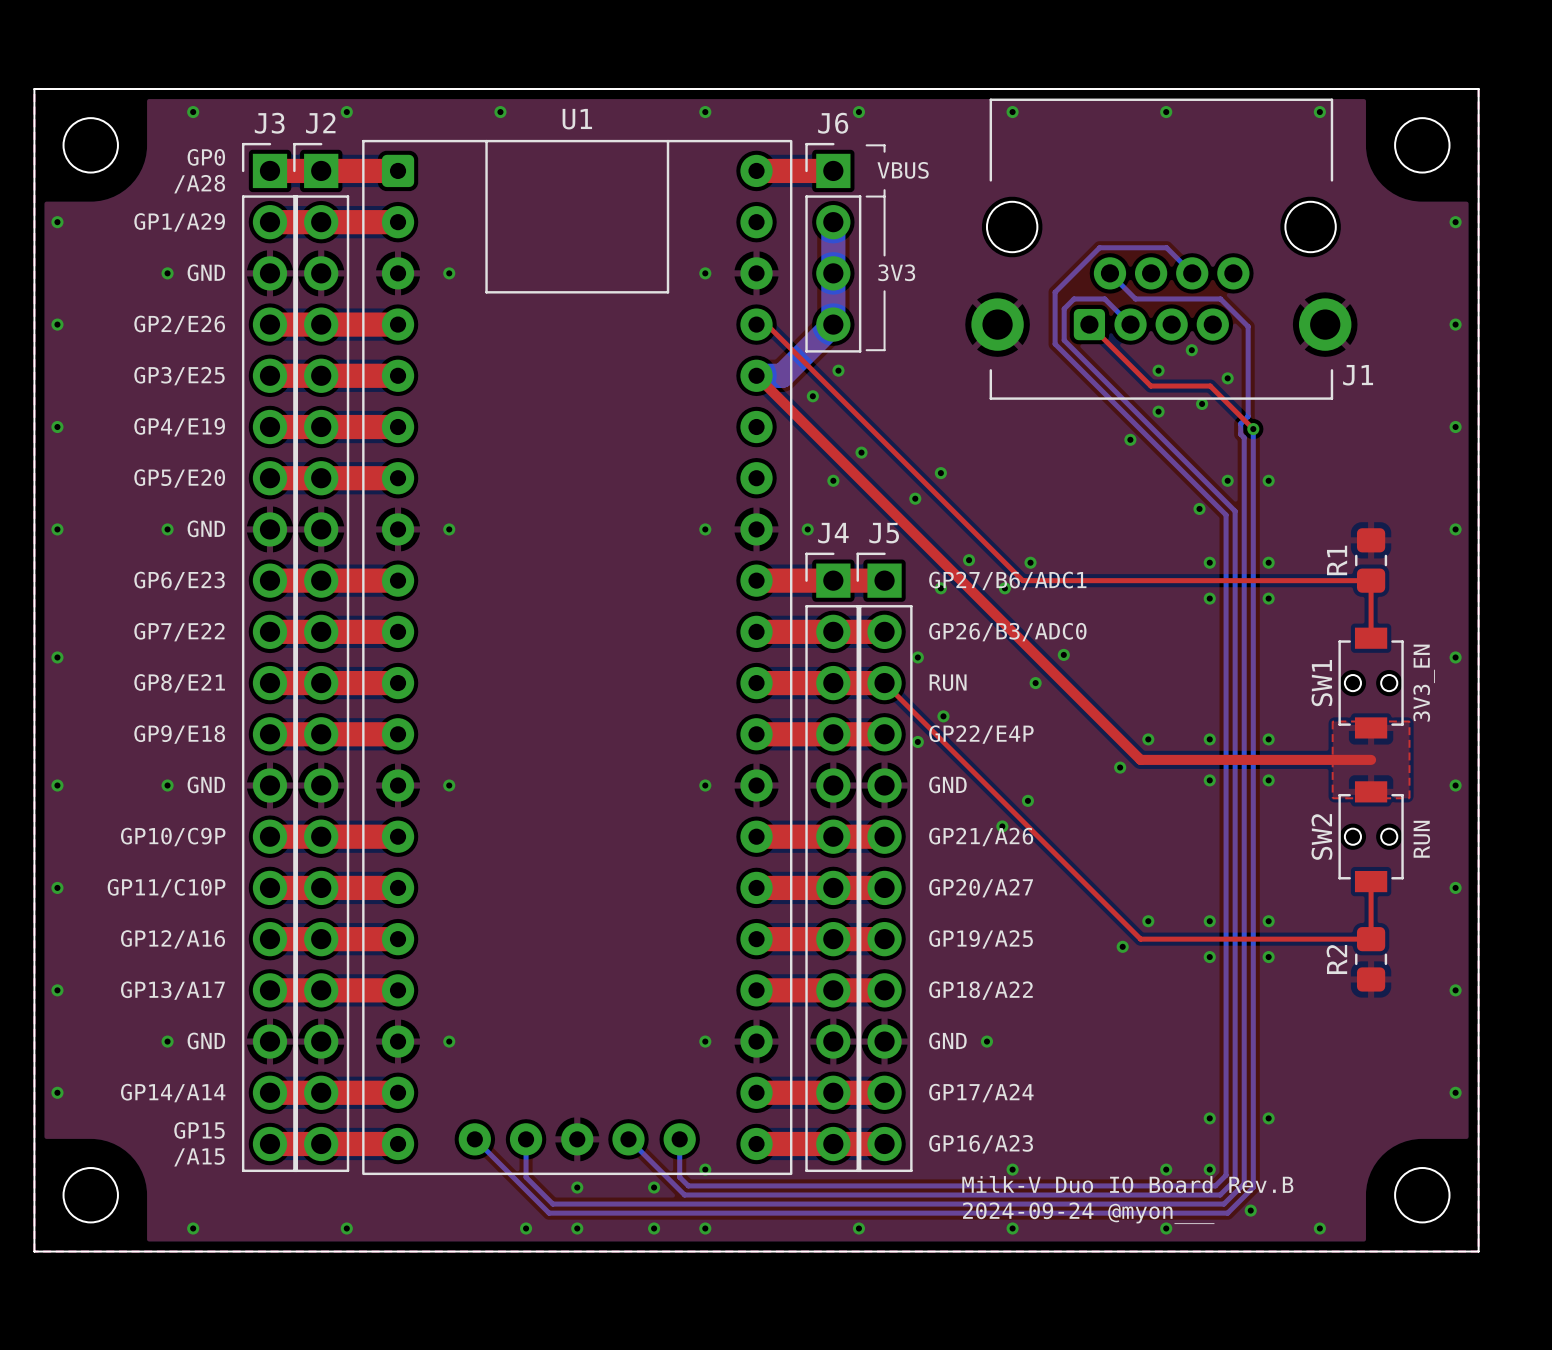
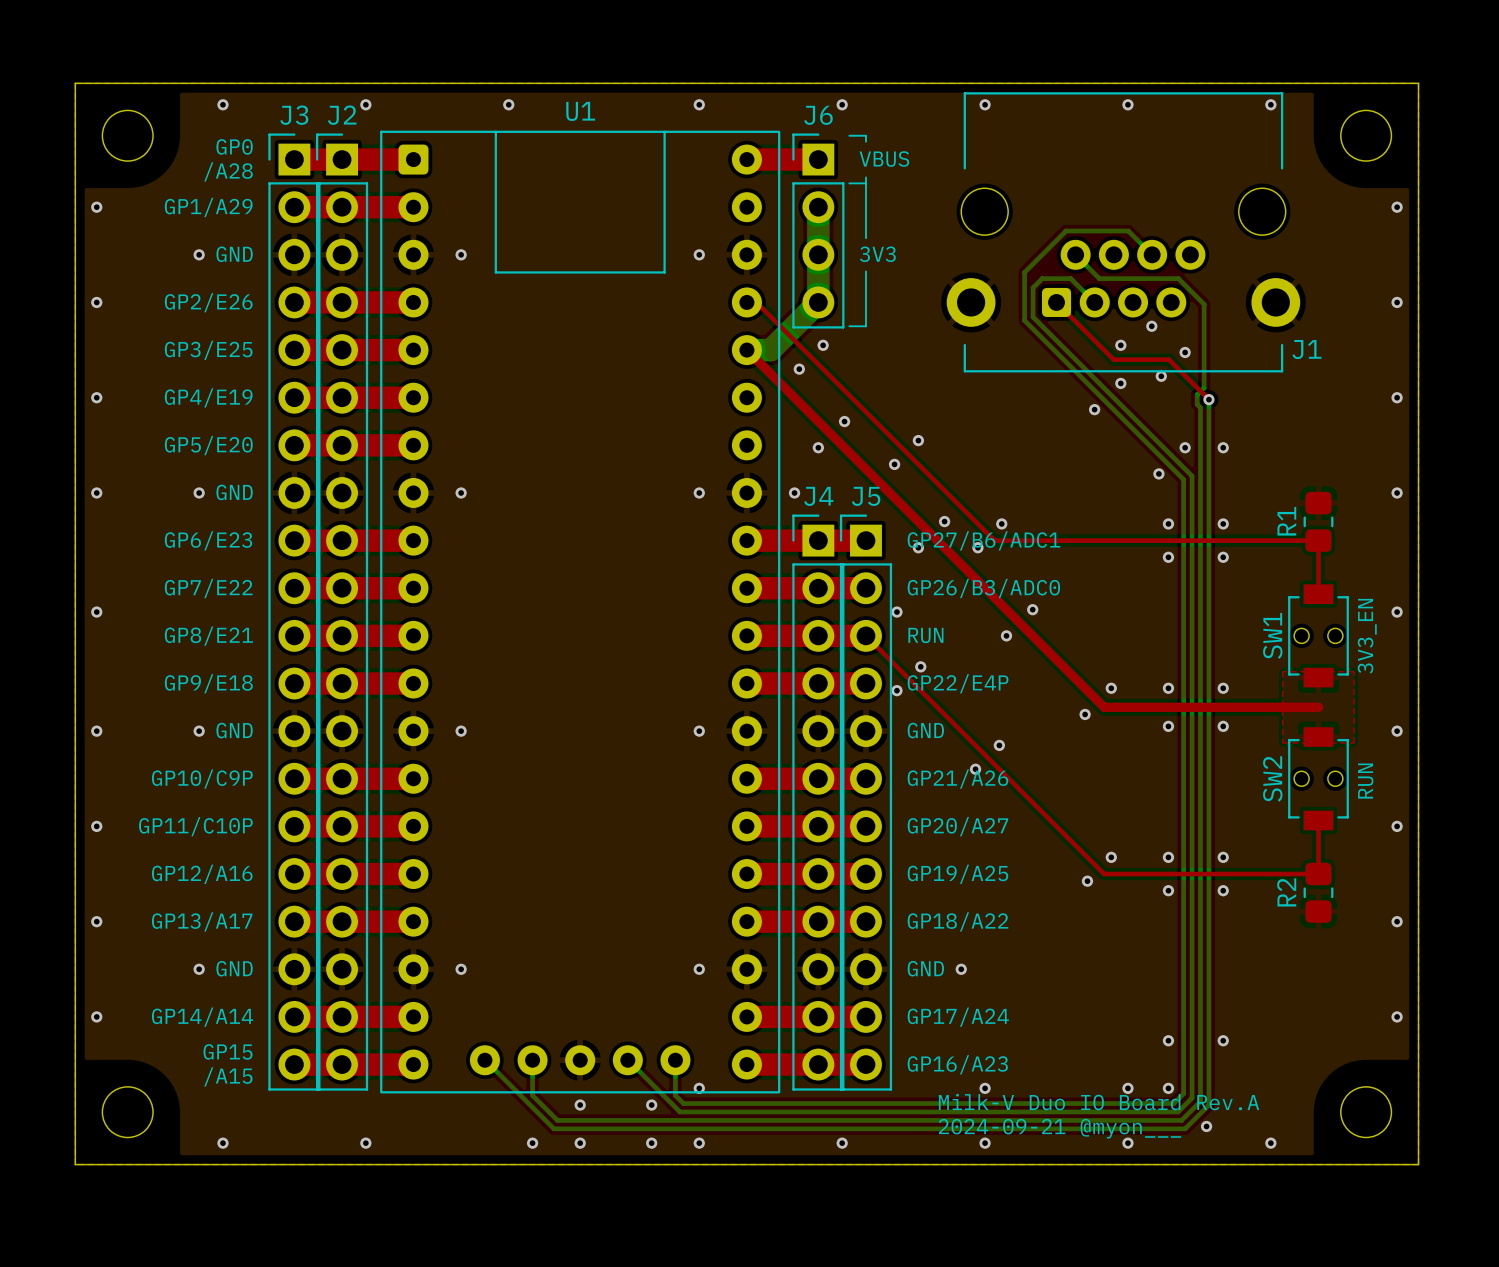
text: Milk-V Duo IO Board Rev.B (1127, 1184) -> Milk-V Duo IO Board Rev.A (1099, 1102)
text: 2024-09-24 @myon___ (1088, 1213) -> 2024-09-21 @myon___ (1060, 1128)

